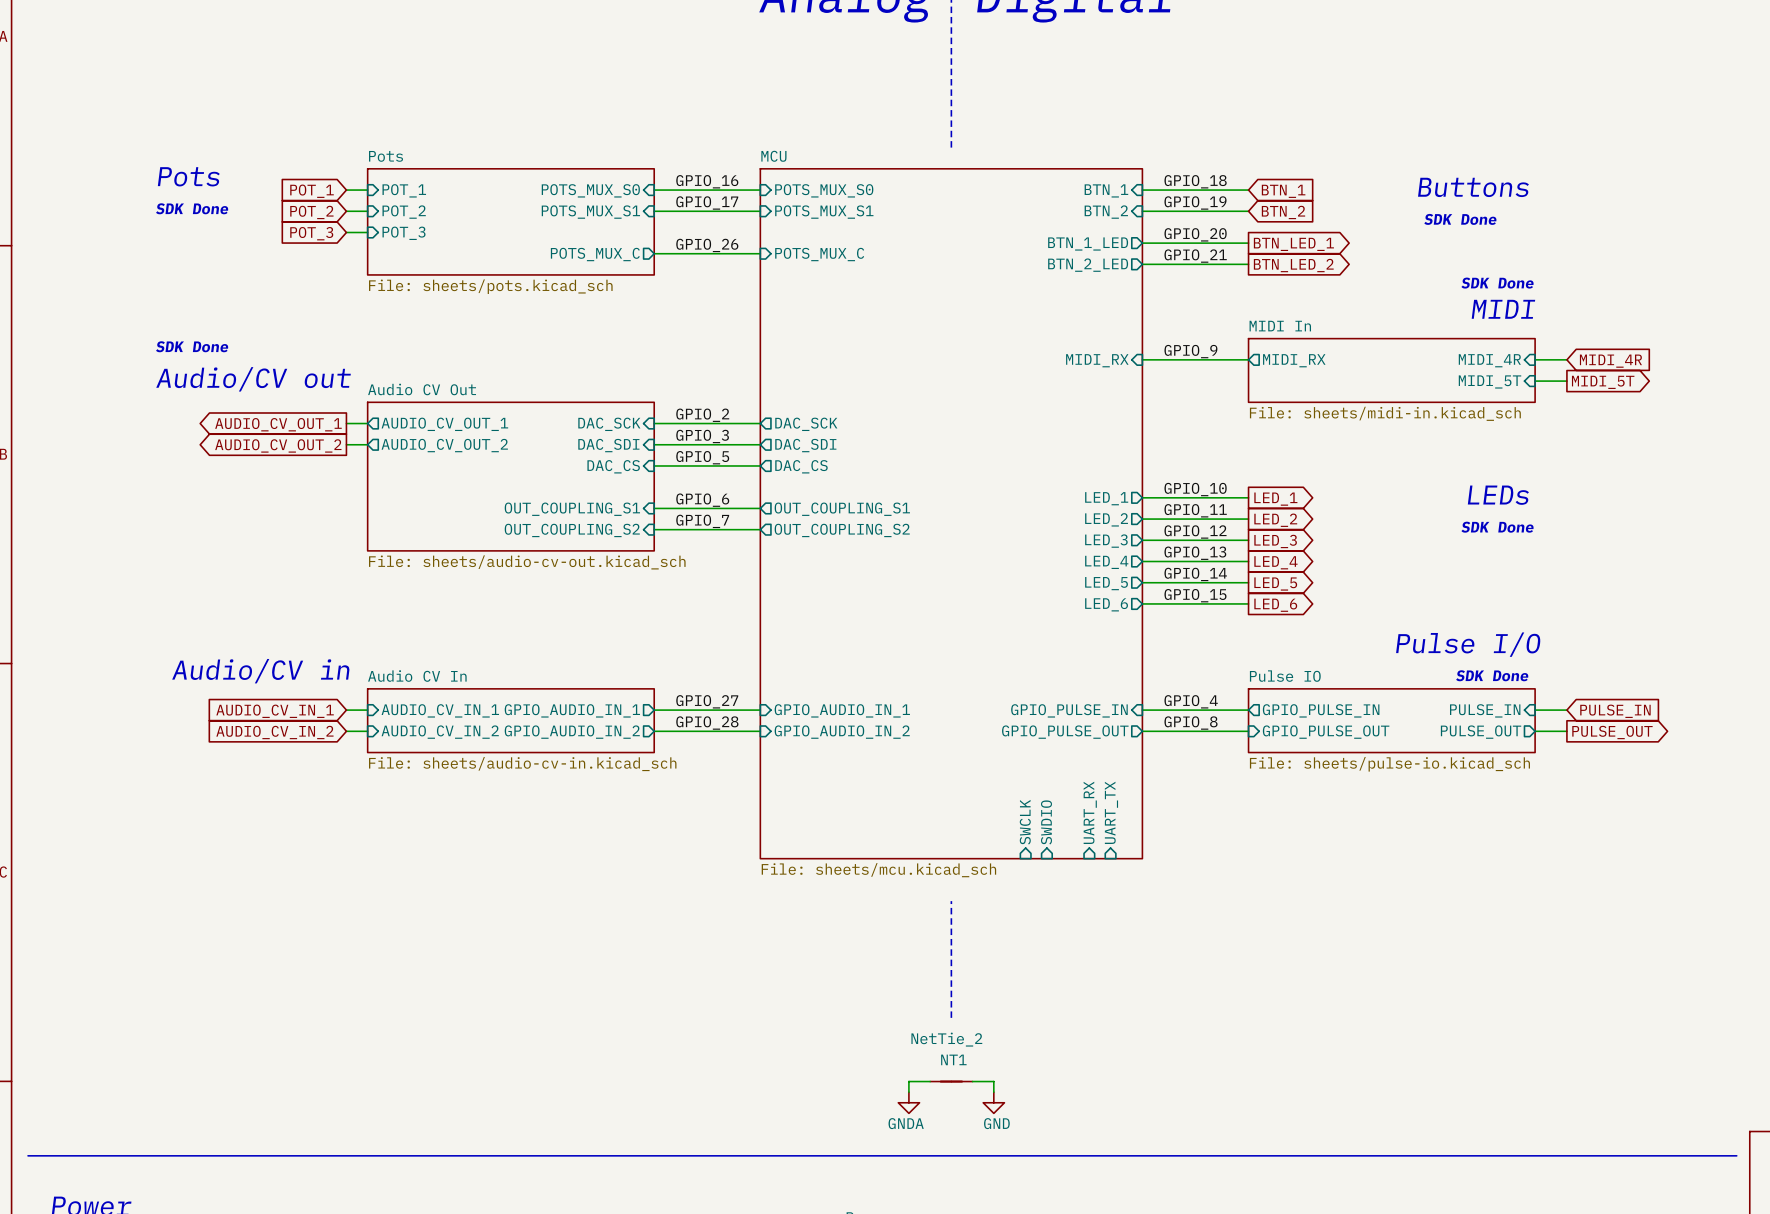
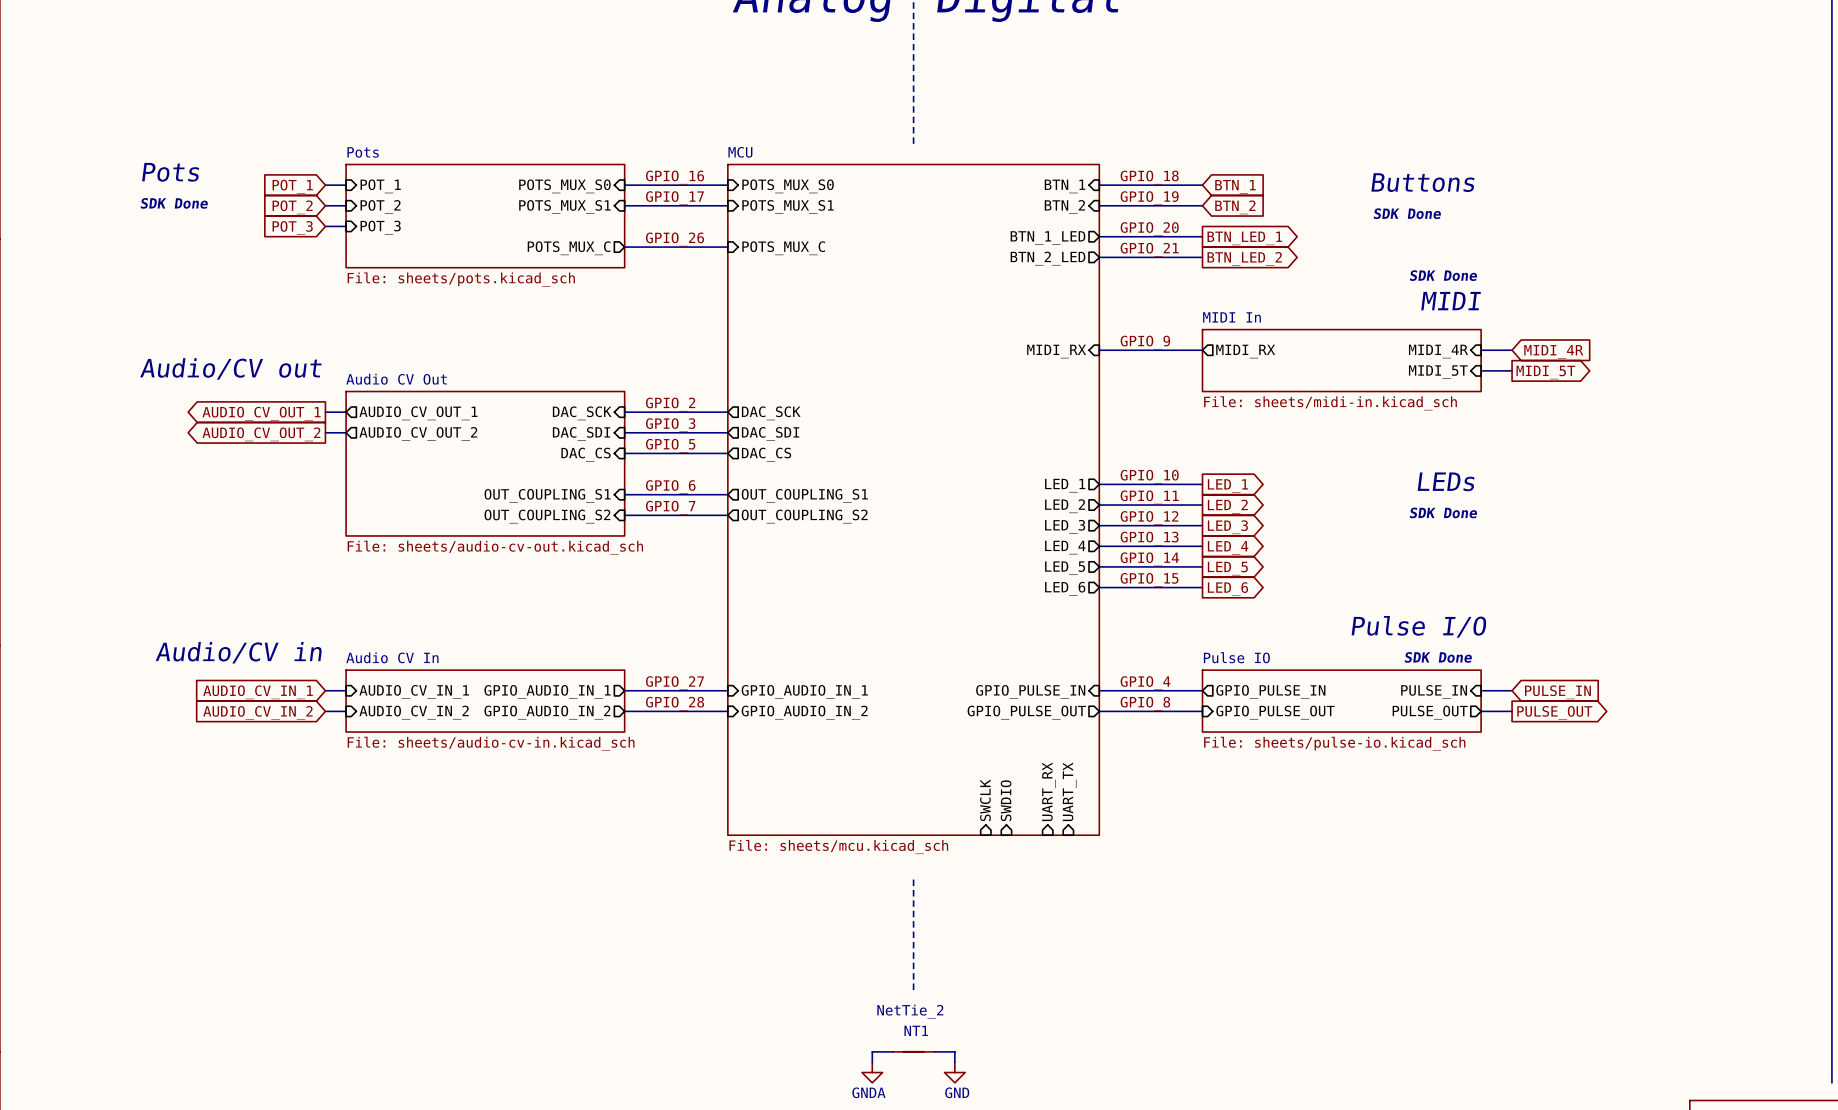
text: SDK Done (192, 346) -> none

